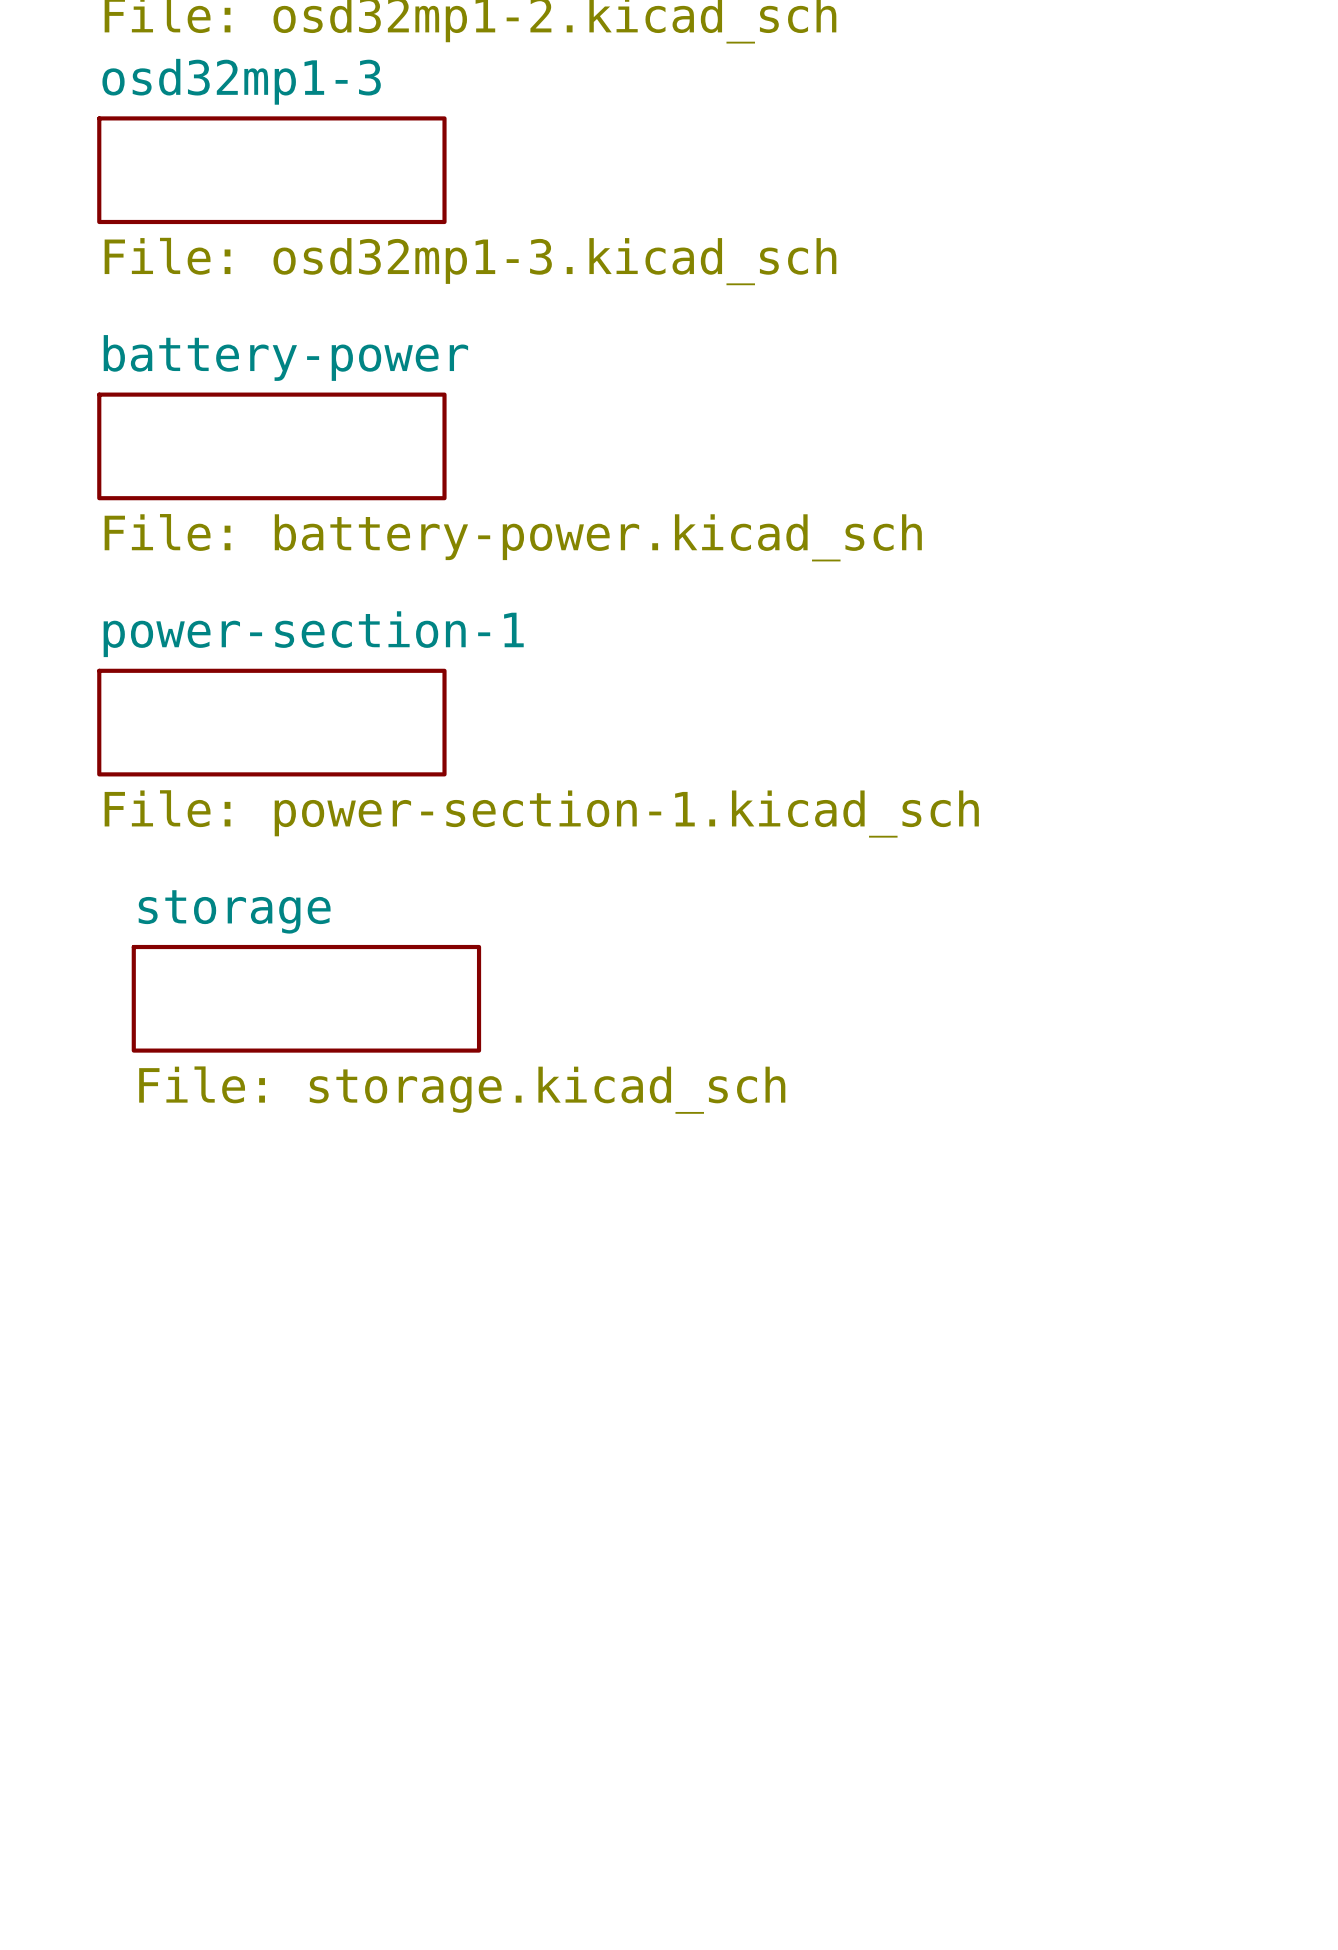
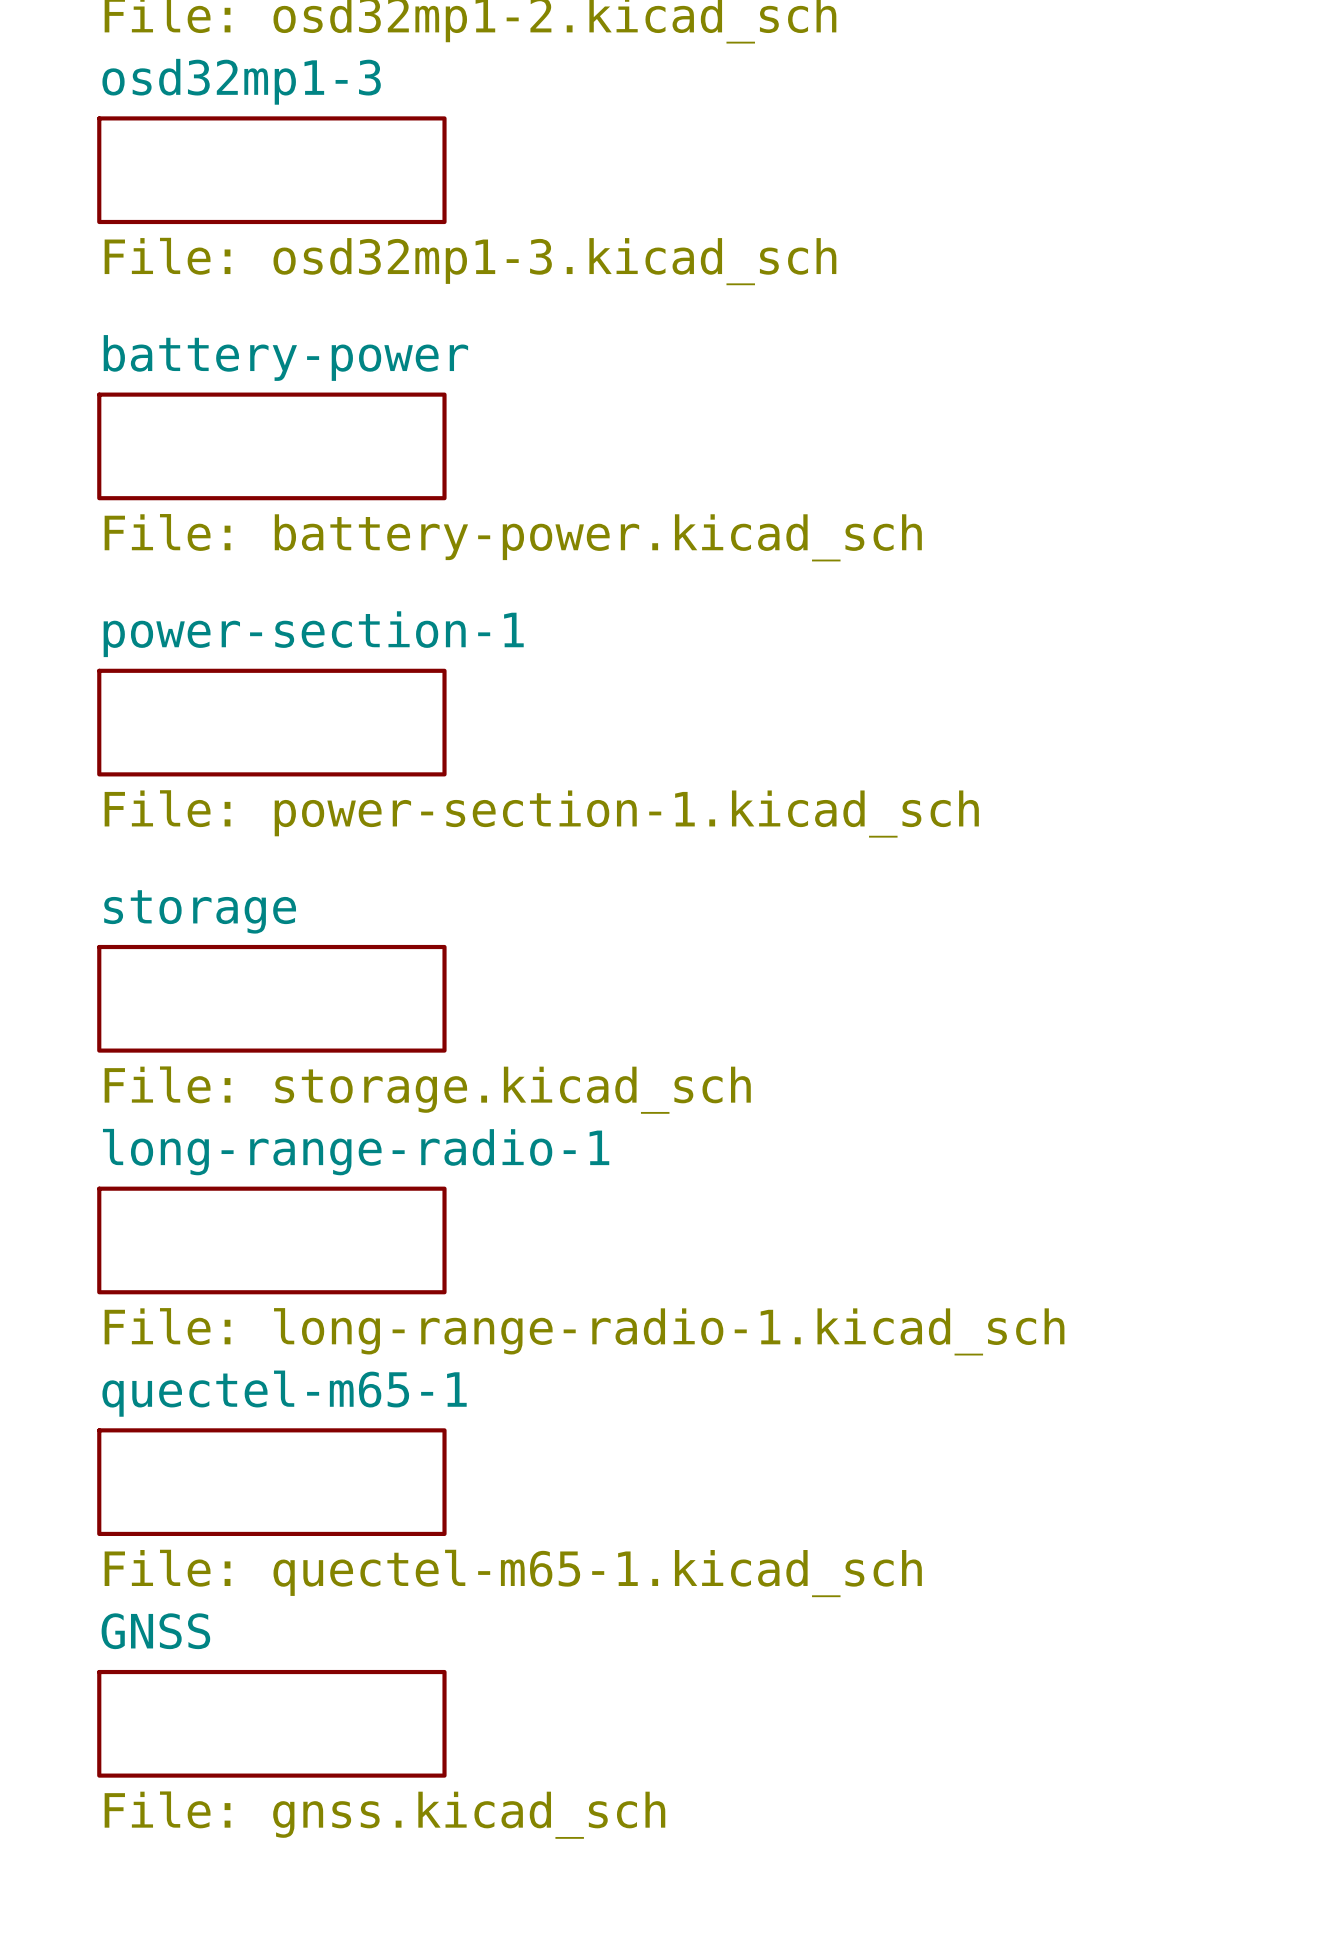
sheet storage position: (306, 998) -> (271, 998)
sheet long-range-radio-1: none -> File: long-range-radio-1.kicad_sch (271, 1240)
sheet quectel-m65-1: none -> File: quectel-m65-1.kicad_sch (271, 1482)
sheet GNSS: none -> File: gnss.kicad_sch (271, 1723)

